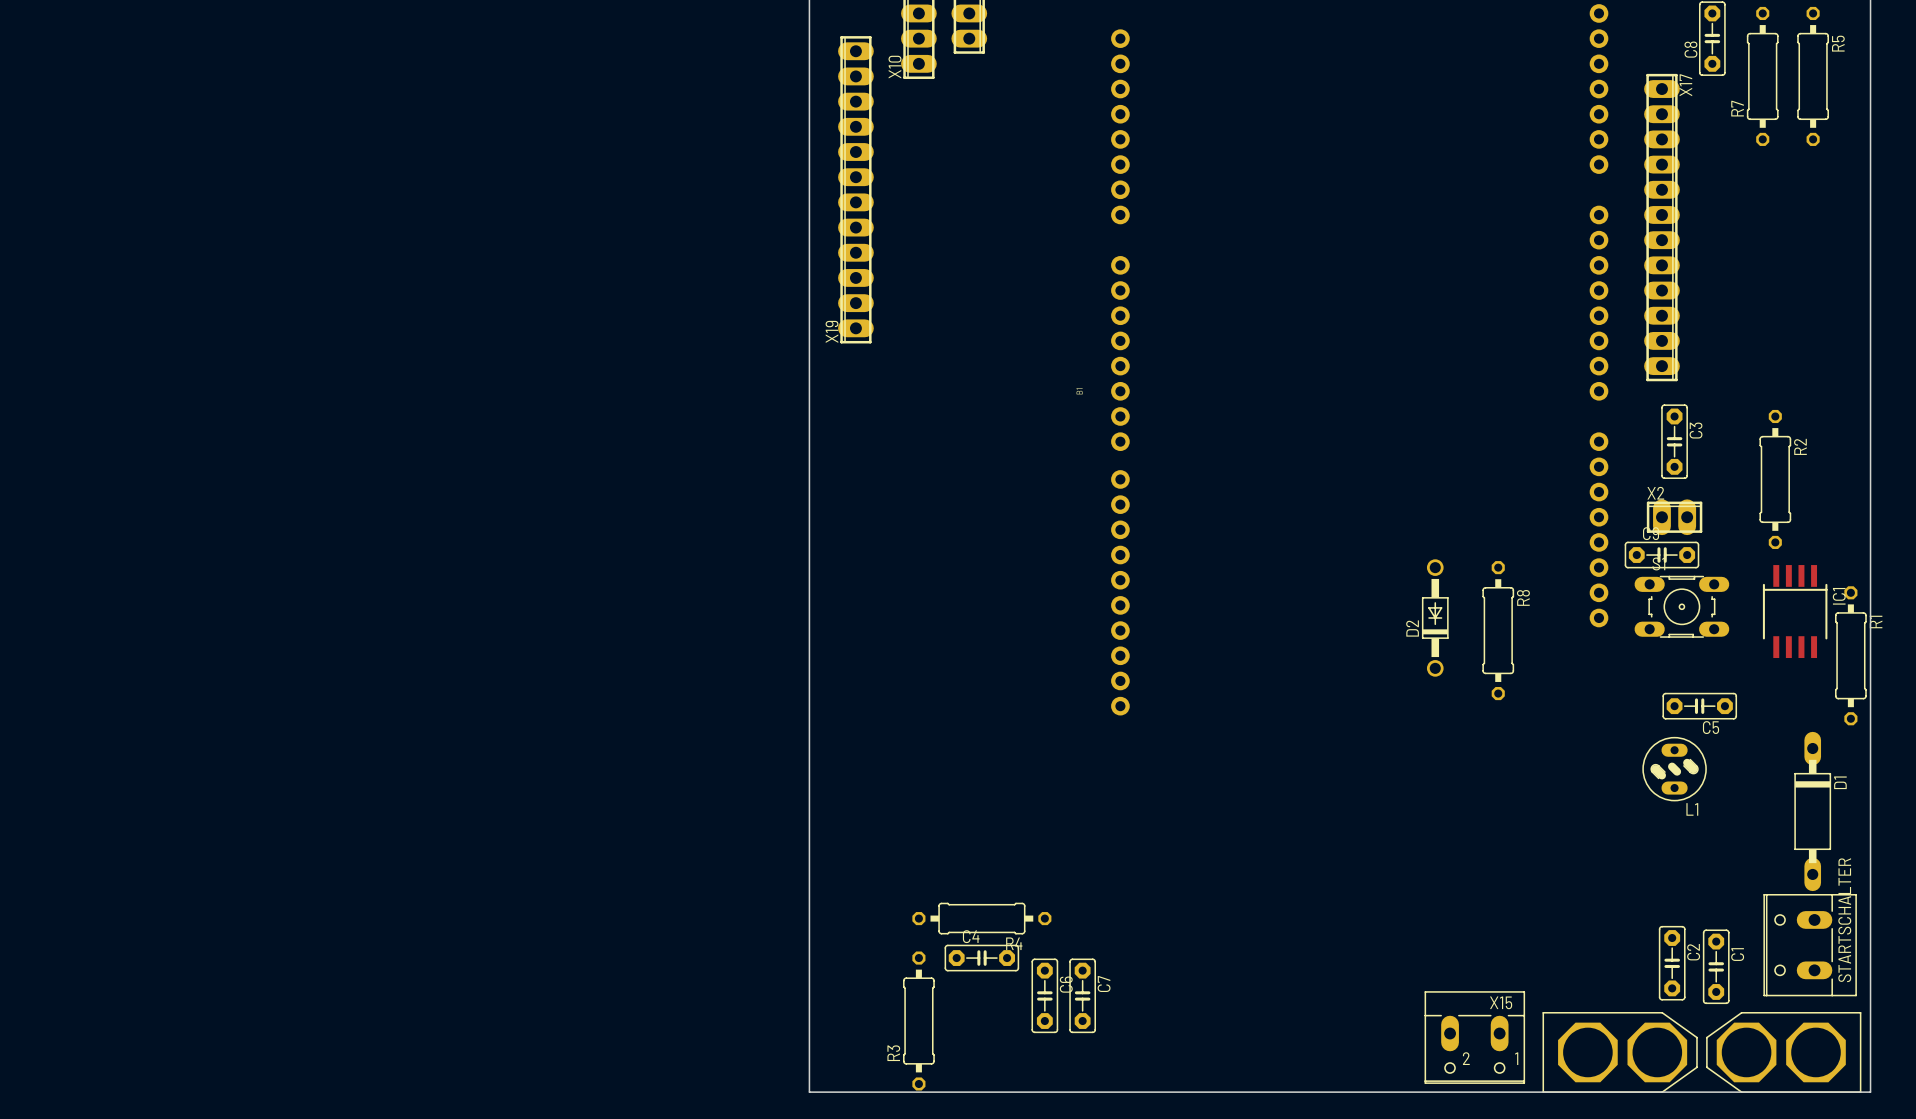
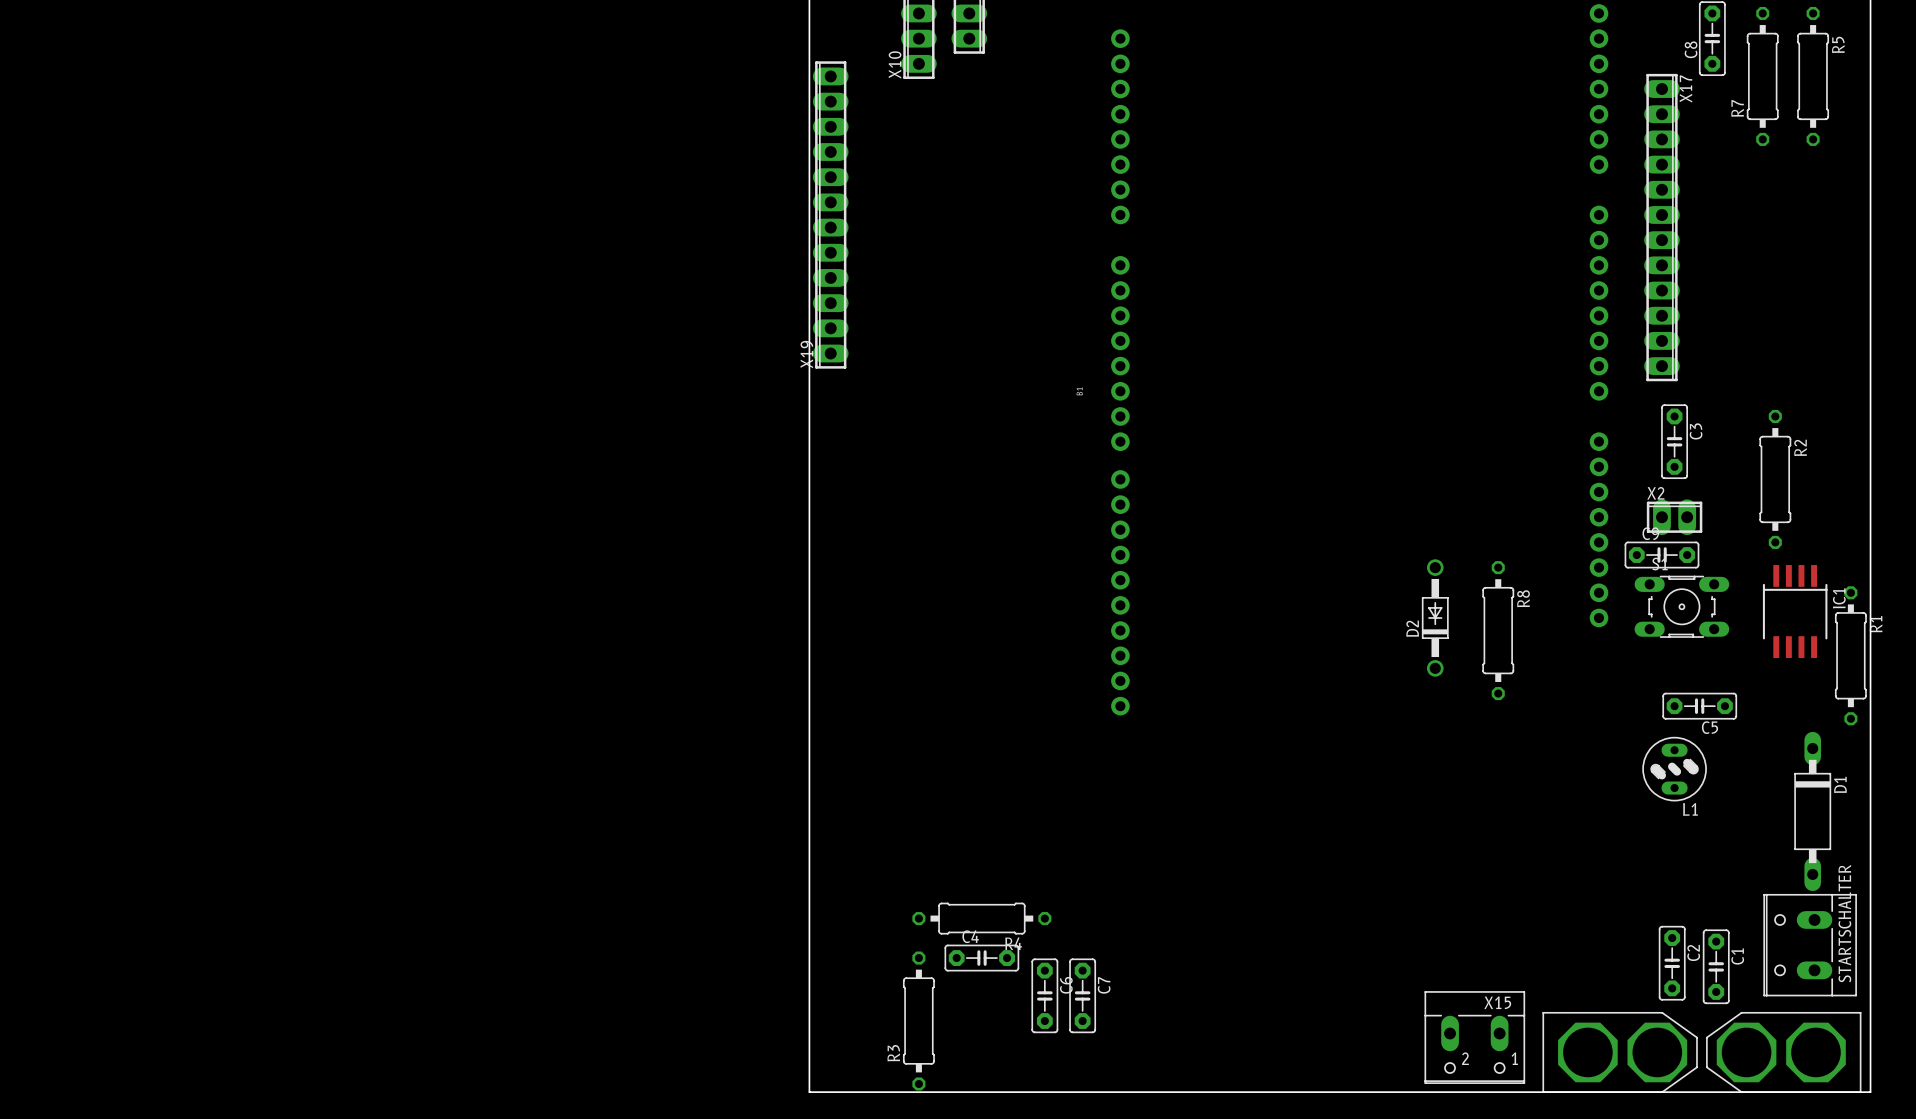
X19 position: (855, 189) -> (830, 214)

